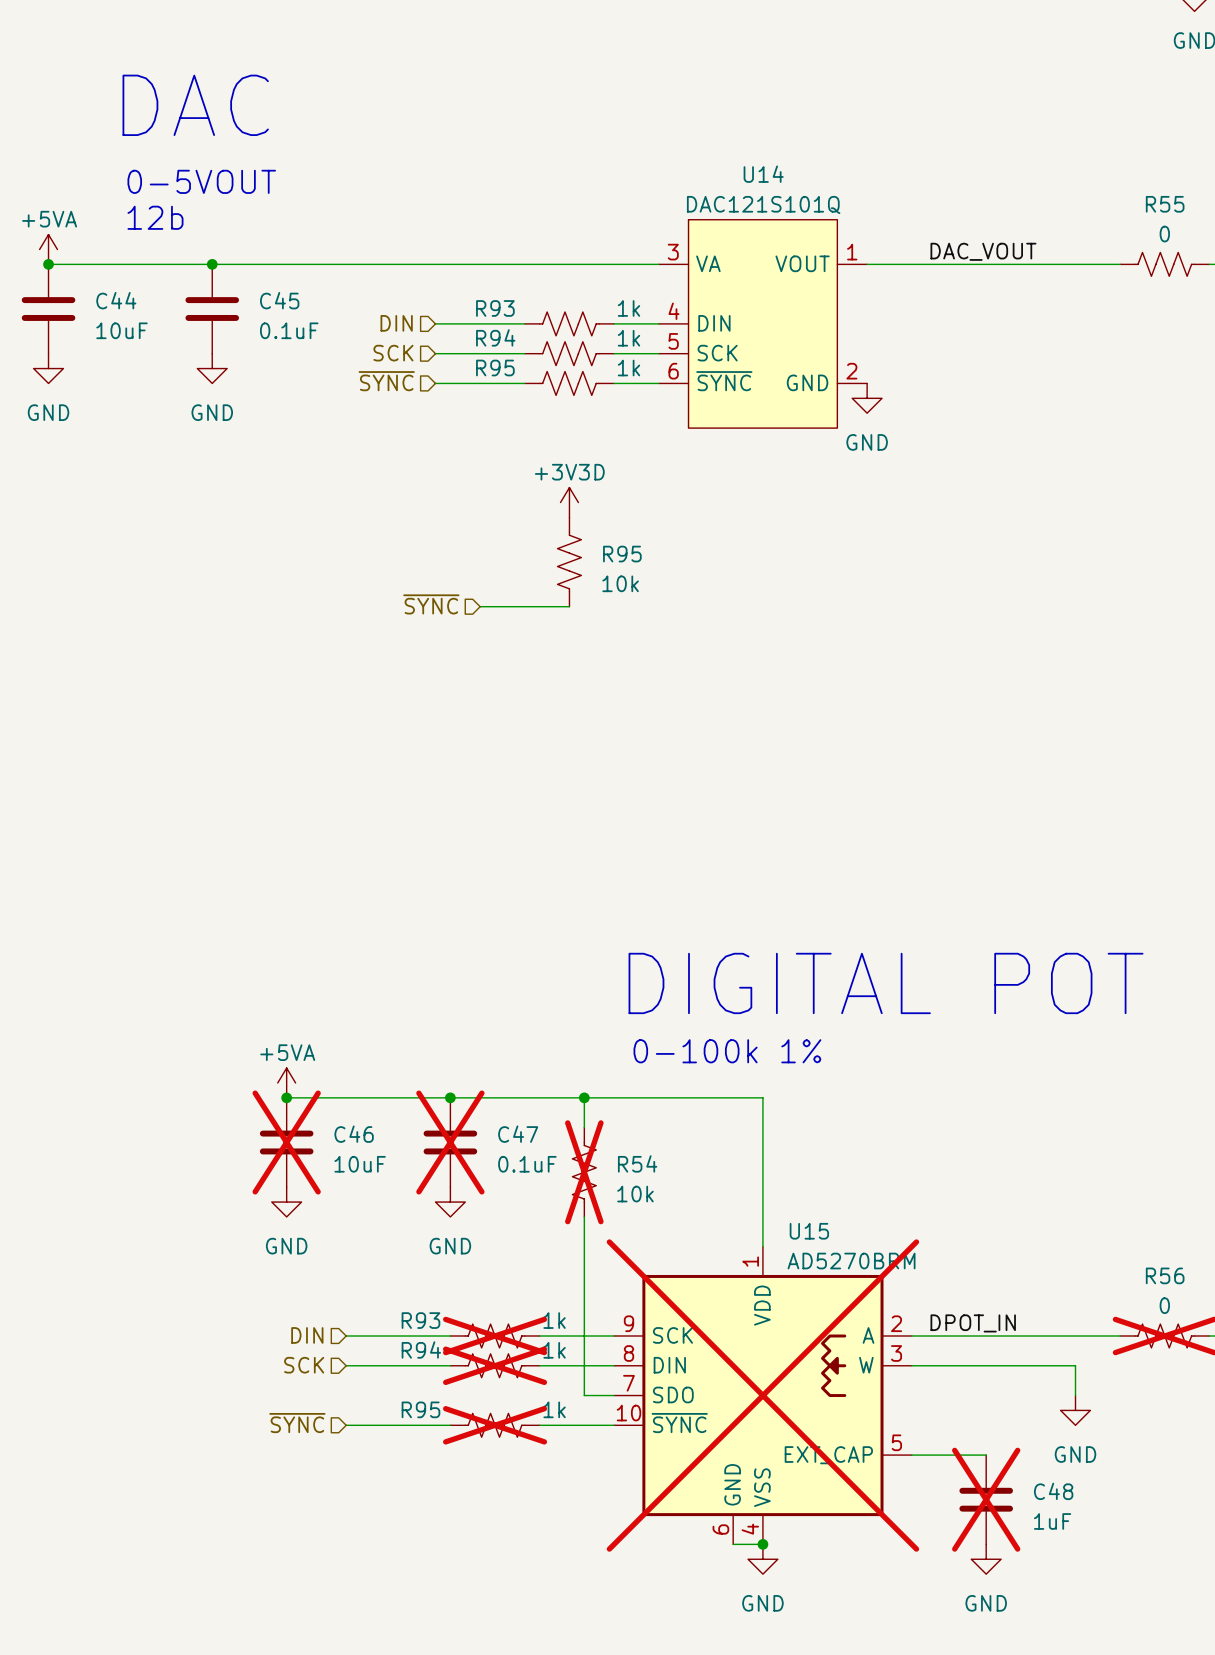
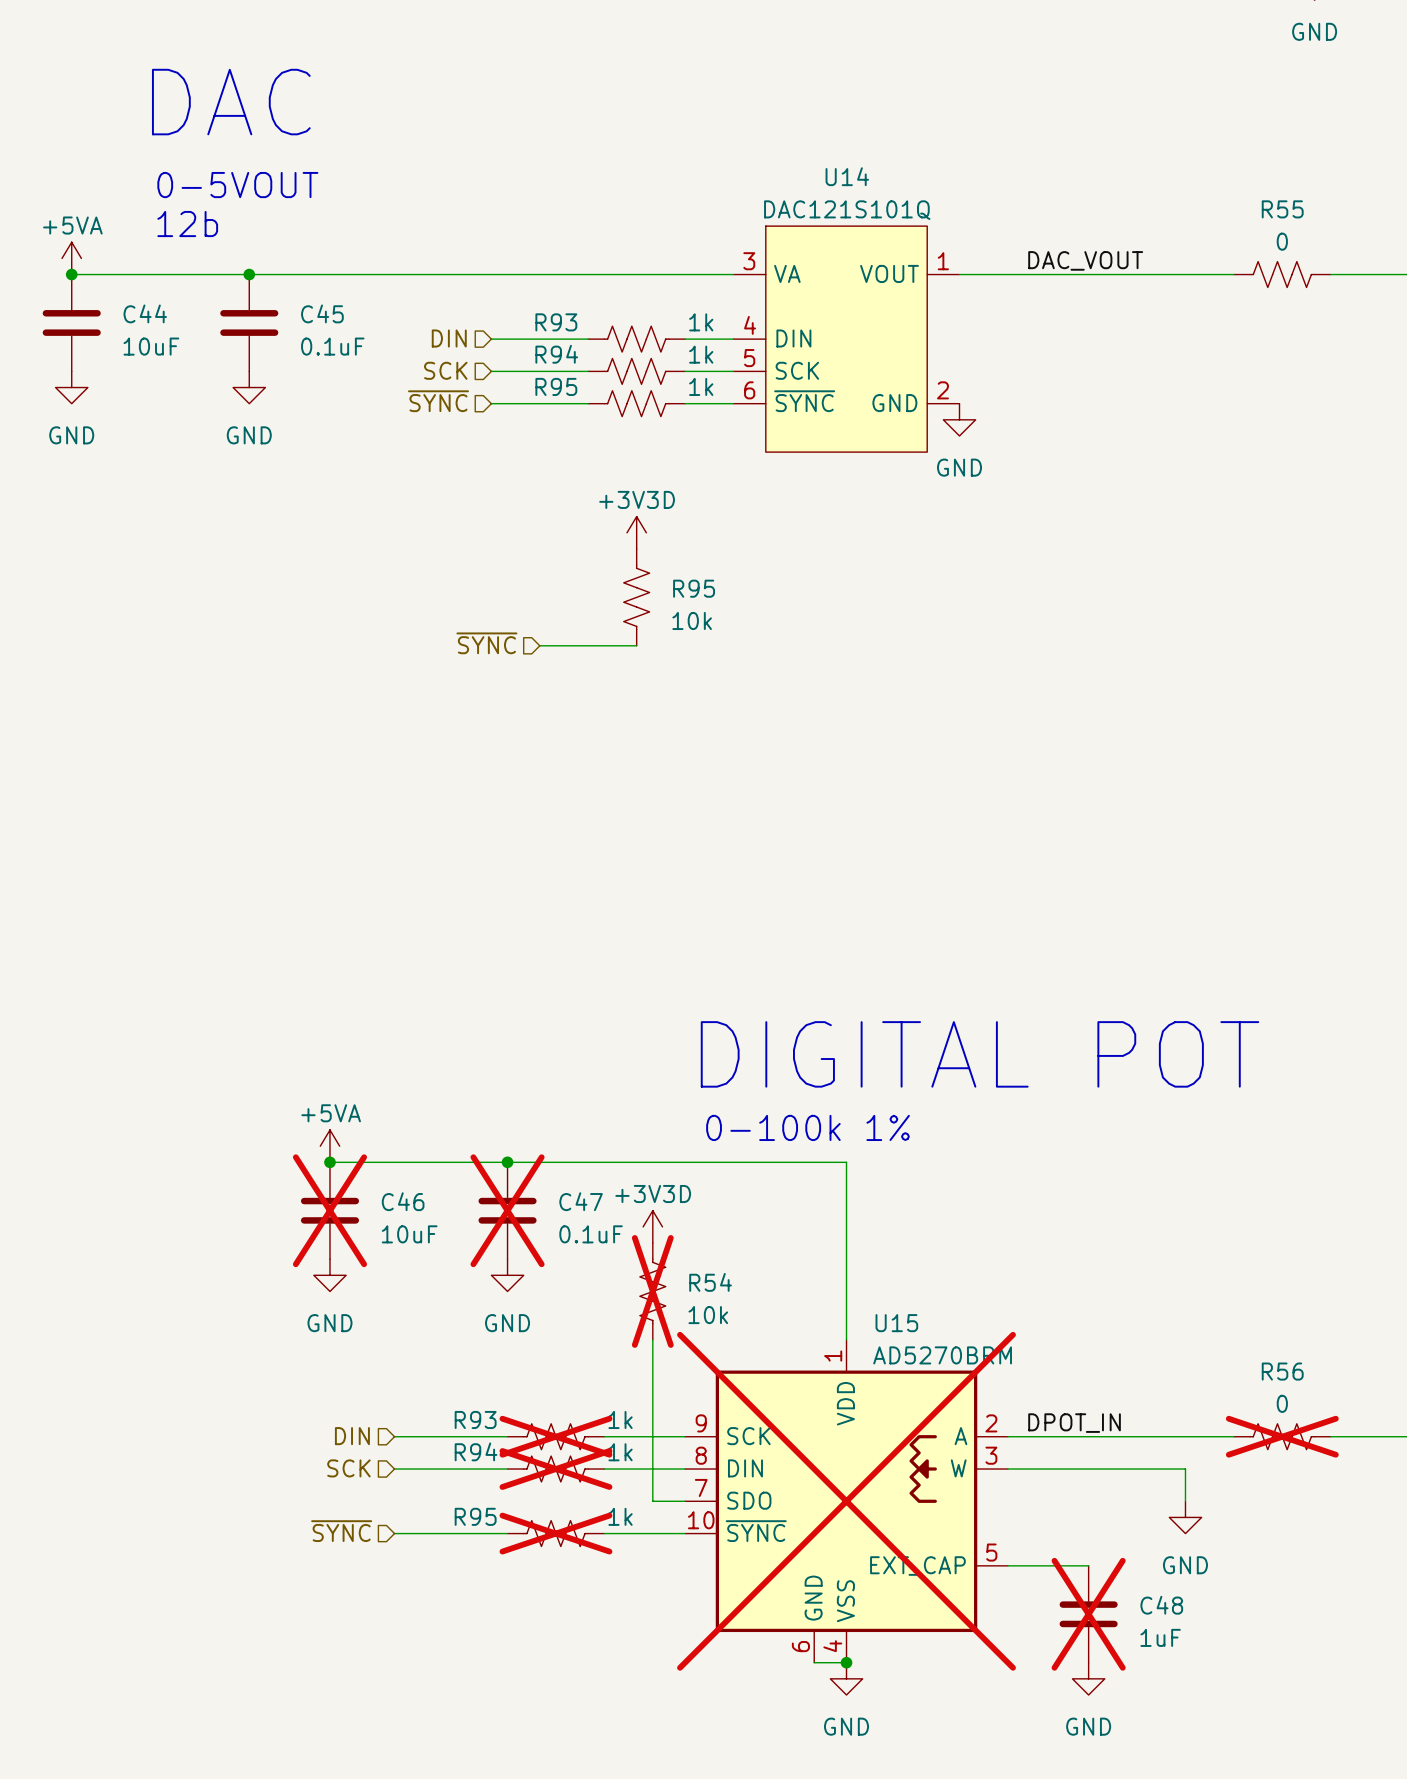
power symbol position: +5VA (286, 1082) -> +5VA (329, 1146)
wire: (286, 1097) (762, 1097) -> (329, 1162) (846, 1162) (846, 1178)
junction position: (286, 1097) -> (329, 1162)
junction position: (450, 1097) -> (507, 1162)
wire: (584, 1097) (584, 1127) -> none
junction: (584, 1097) -> none
C46 position: (286, 1142) -> (329, 1210)
C47 position: (450, 1142) -> (507, 1210)
power symbol: none -> +3V3D (652, 1226)
R54 position: (584, 1172) -> (652, 1291)
power symbol position: GND (286, 1202) -> GND (329, 1275)
power symbol position: GND (450, 1202) -> GND (507, 1275)

